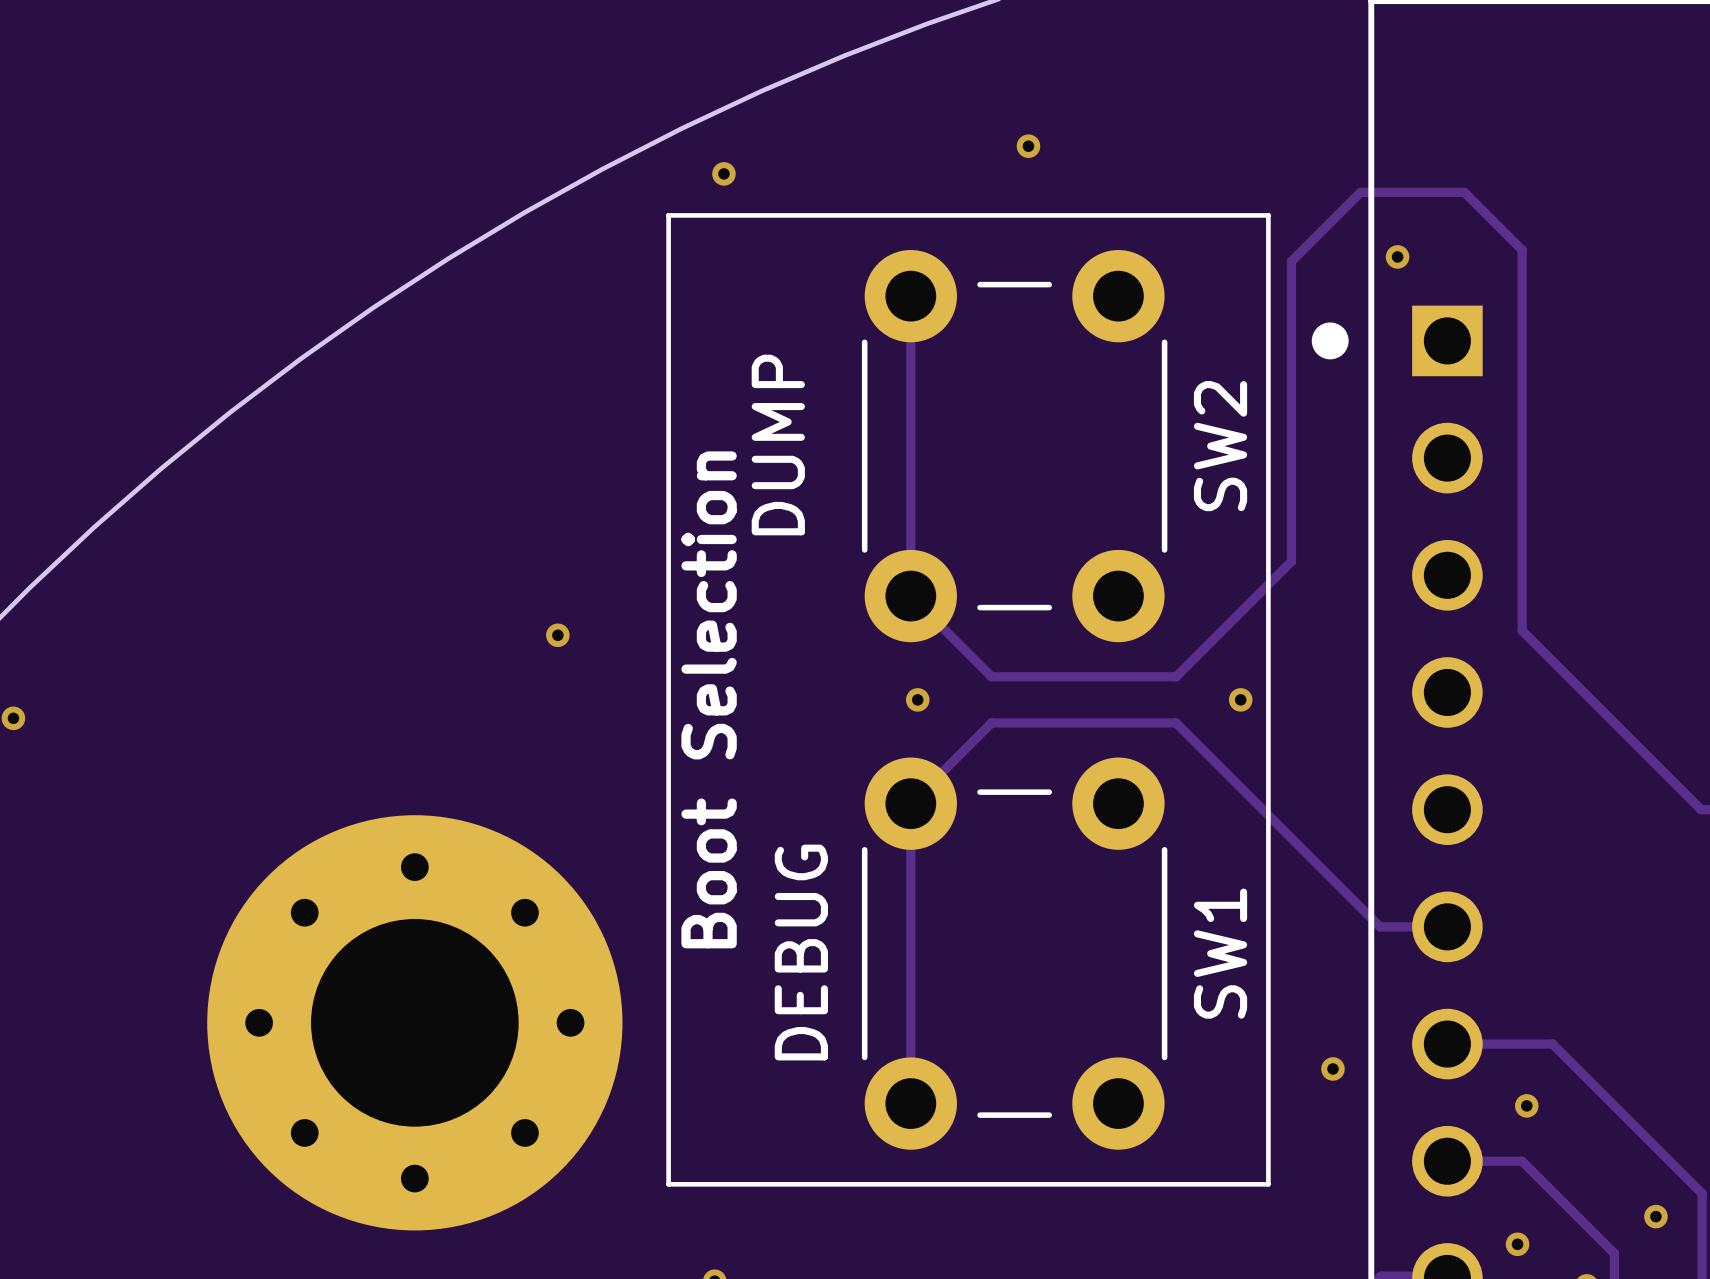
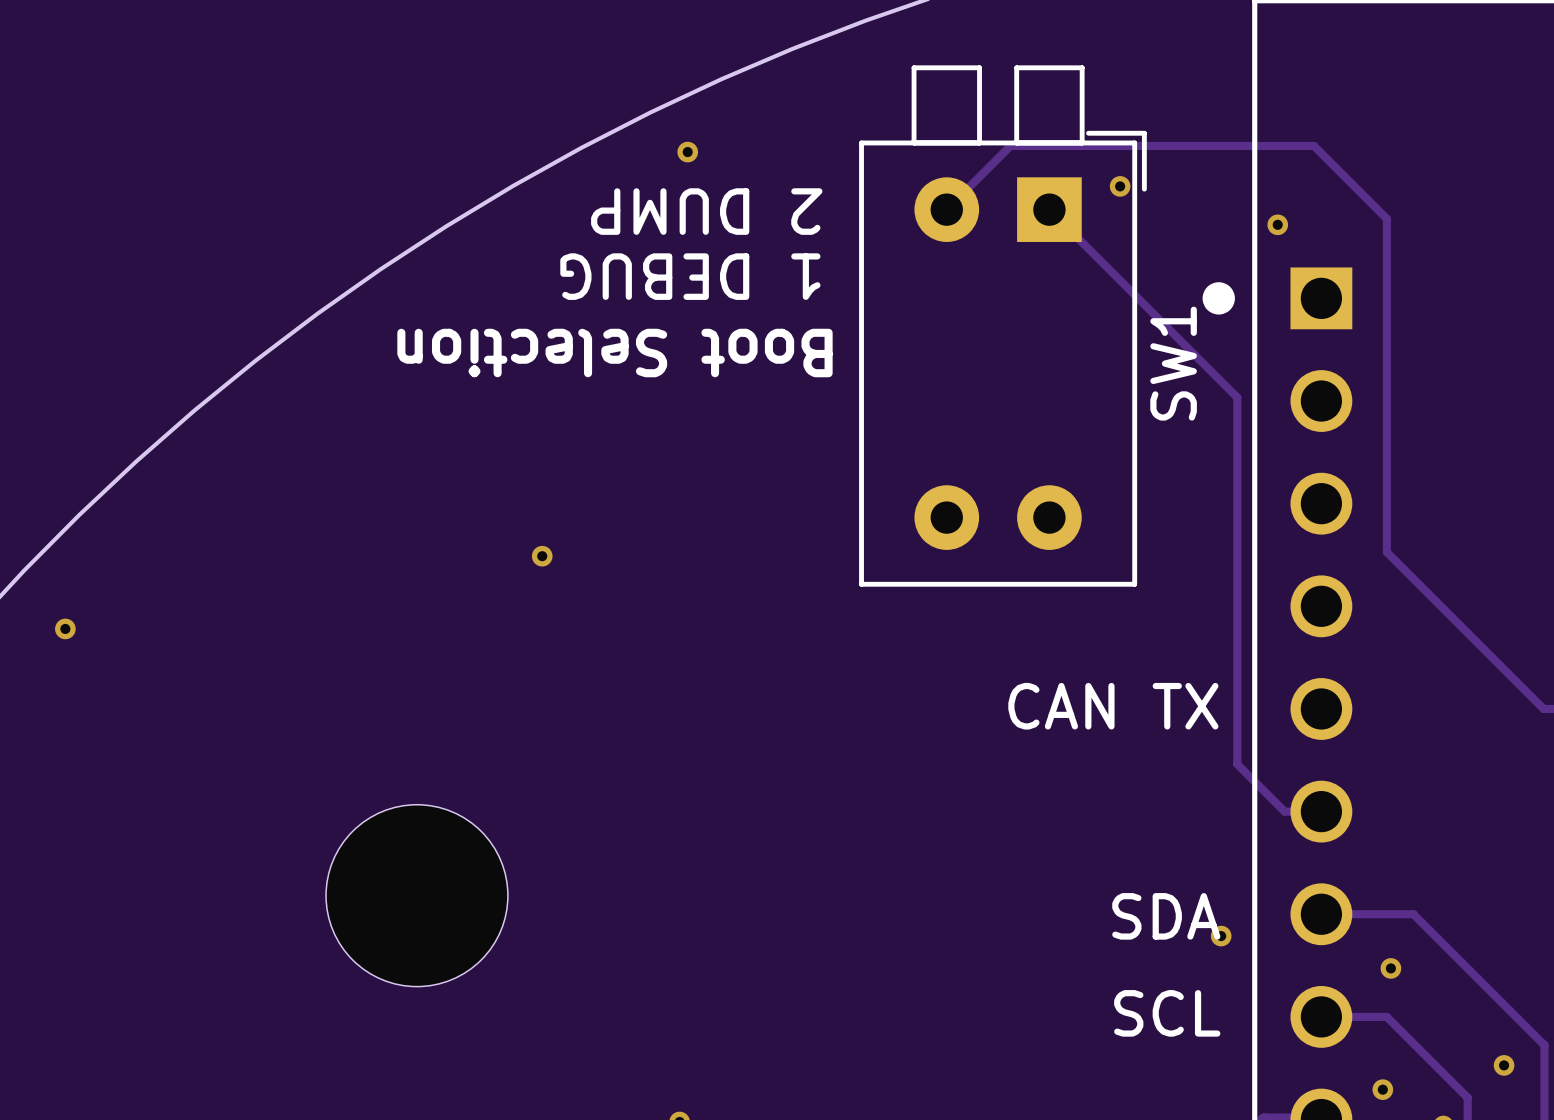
via position: (1028, 146) -> (1120, 186)
track: (1464, 192) (1360, 192) (1291, 261) (1291, 561) (1176, 676) (991, 676) (910, 596) (910, 296) -> (1336, 168) (1314, 145) (1010, 145) (946, 209)
line: (668, 215) (1268, 215) (1268, 1184) (668, 1184) (668, 215) -> none
text: none -> 2 DUMP (706, 211)
text: none -> 1 DEBUG (690, 276)
text: DUMP (778, 445) -> none
SW2: (1014, 446) -> none
text rotation: 0° (709, 699) -> 90° counterclockwise (614, 353)
via: (917, 699) -> none
via: (1240, 699) -> none
SW1 footprint: [861, 757, 1168, 1150] -> [859, 65, 1147, 587]
text: none -> CAN TX (1113, 706)
part footprint: [207, 815, 623, 1231] -> [326, 804, 508, 987]
track: (1405, 926) (1380, 926) (1176, 722) (991, 722) (910, 803) (910, 1103) -> (1284, 811) (1237, 764) (1237, 397) (1049, 209)
text: DEBUG (801, 952) -> none
text: none -> SDA (1166, 916)
text: none -> SCL (1167, 1013)

